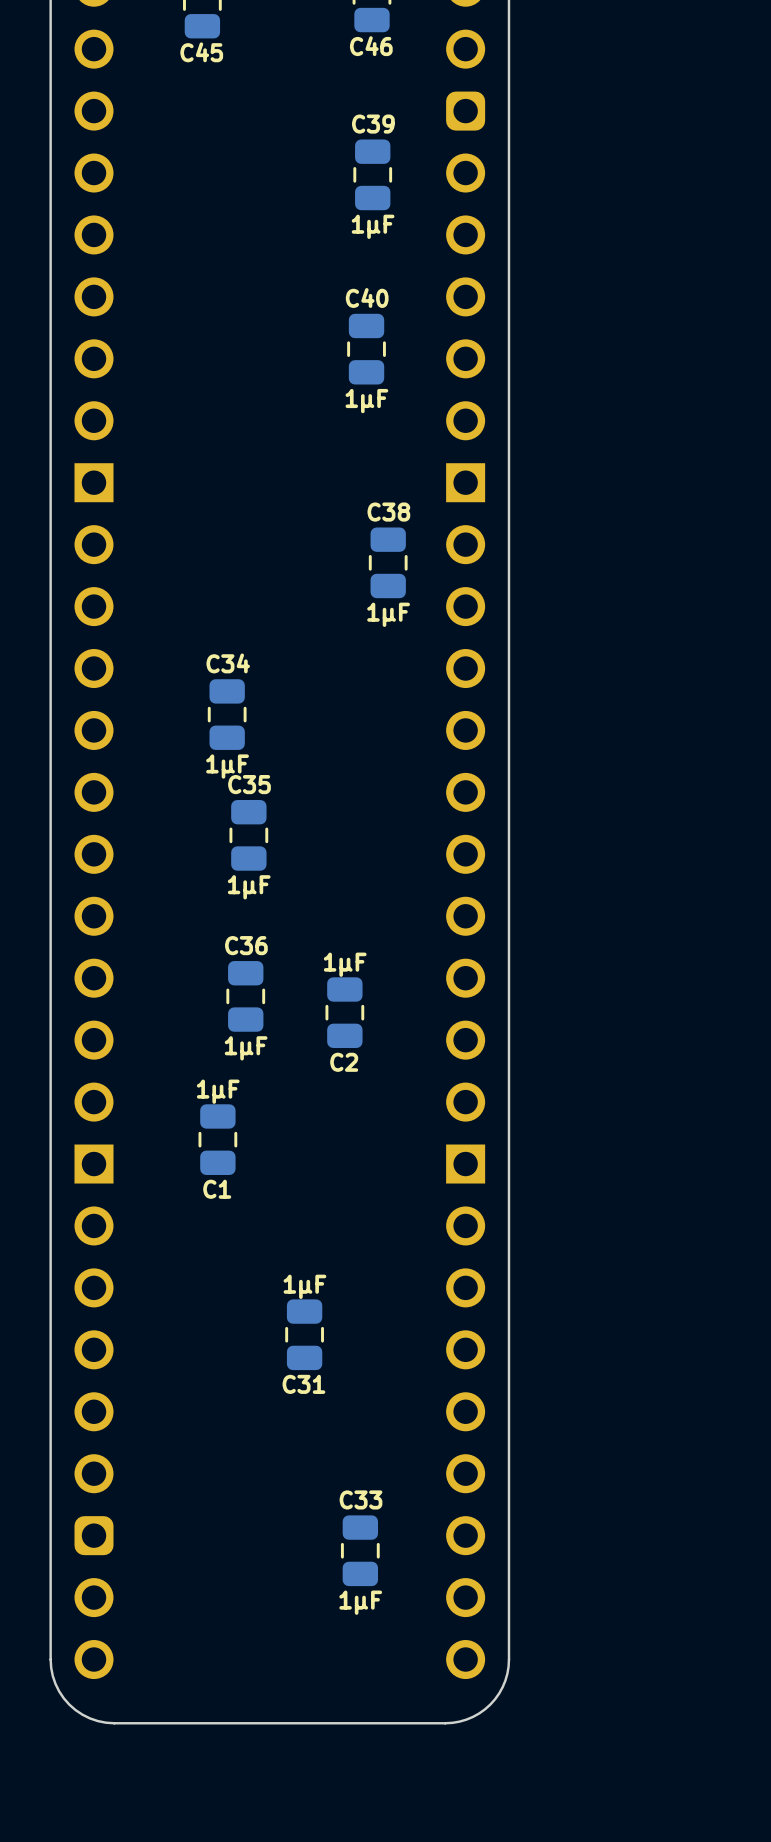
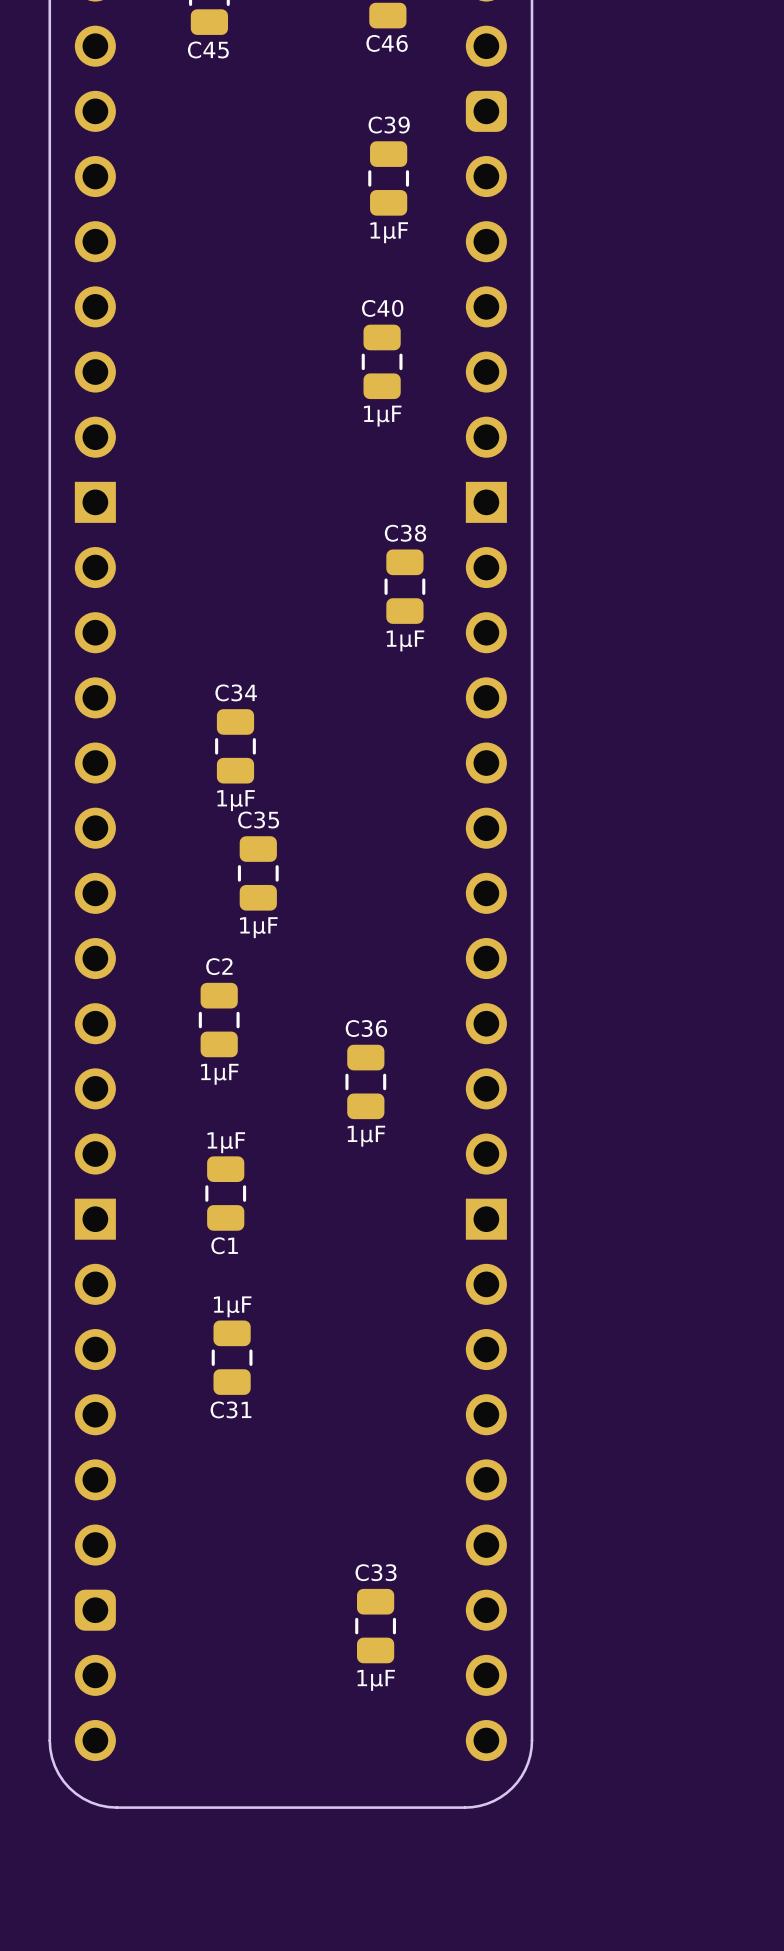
C2 value position: 1μF (345, 964) -> 1μF (219, 1074)
C36 position: (245, 996) -> (365, 1081)
C2 position: (344, 1012) -> (219, 1020)
C2 name position: C2 (344, 1062) -> C2 (219, 966)
C31 position: (304, 1334) -> (232, 1357)

